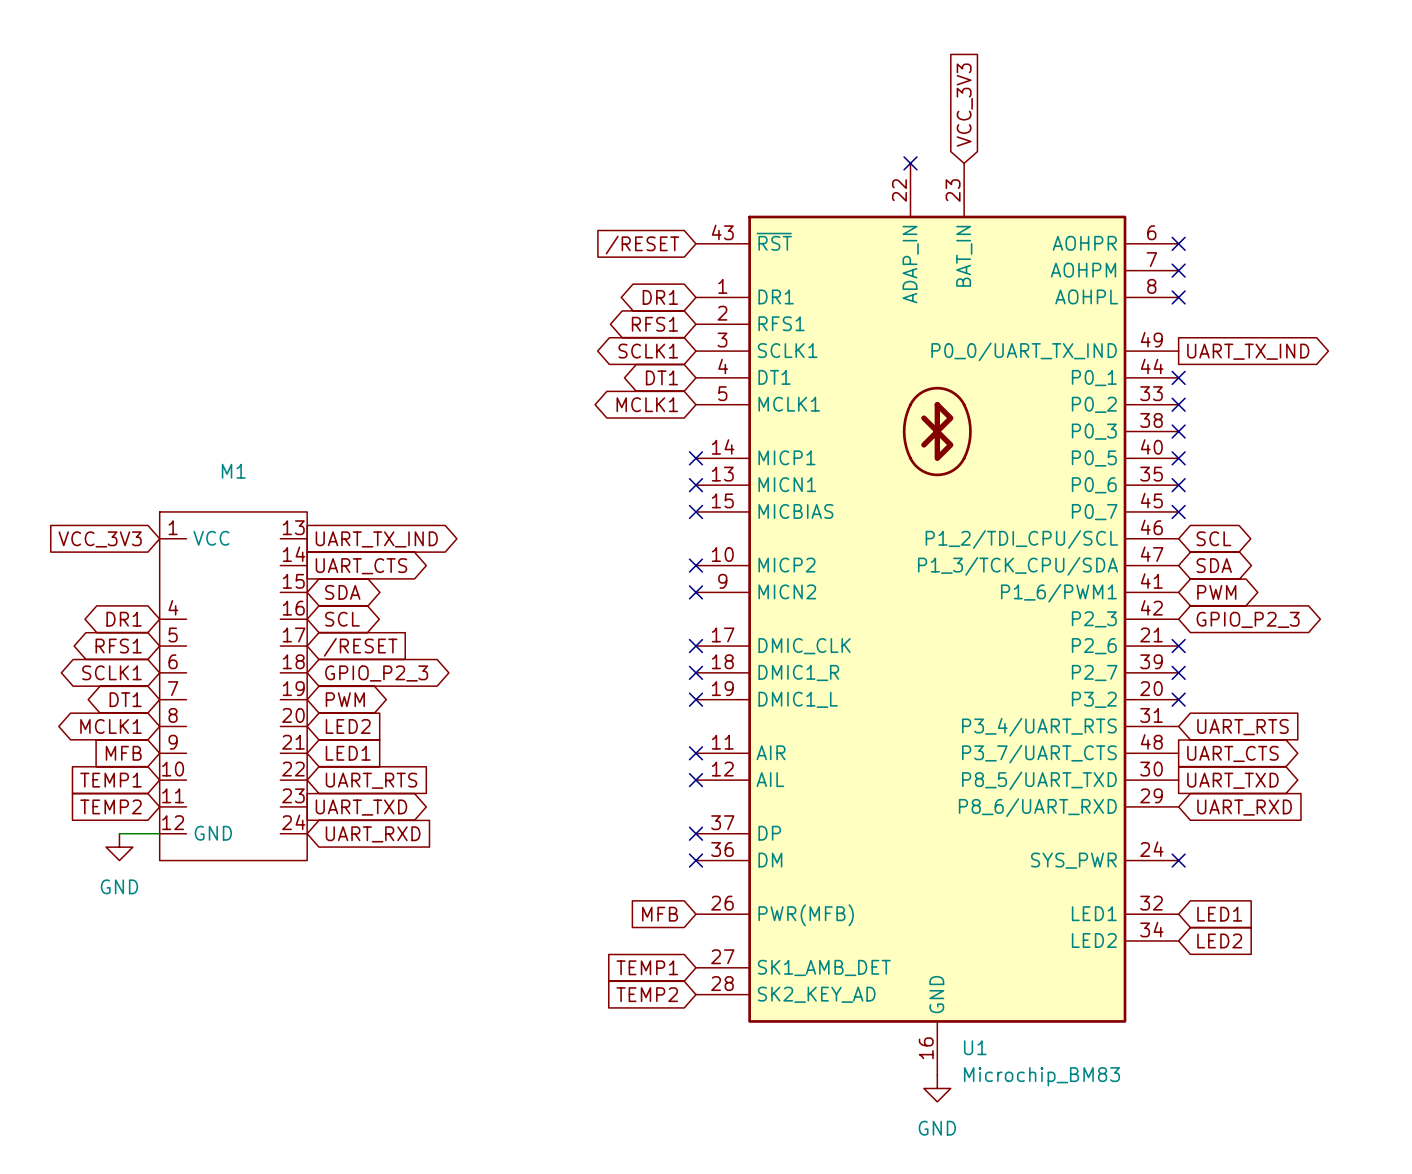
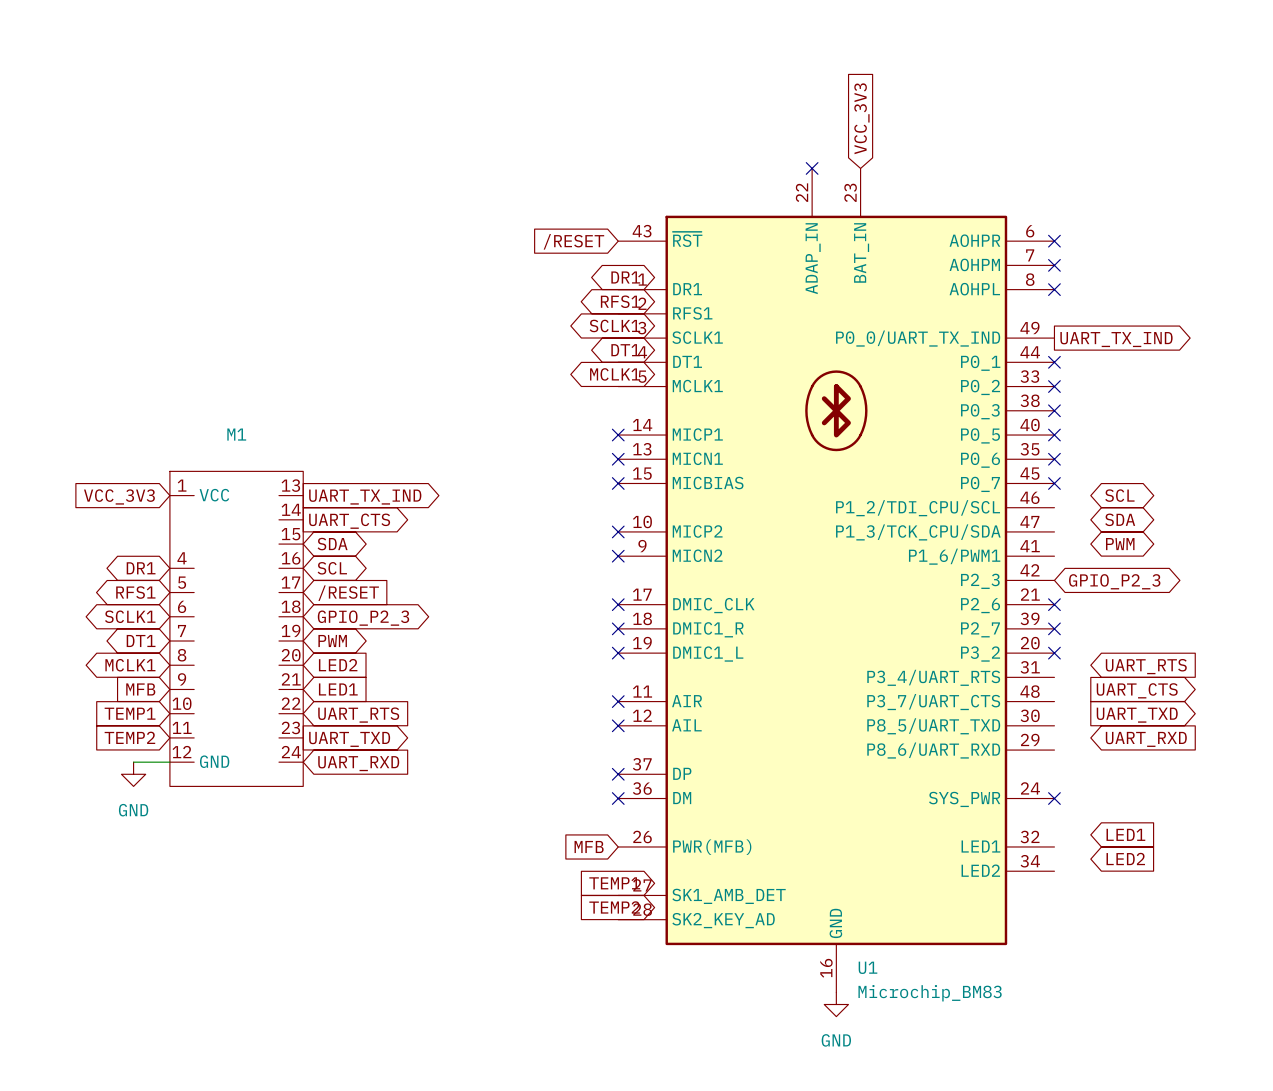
global label position: VCC_3V3 (964, 105) -> VCC_3V3 (861, 118)
no-connect mark position: (910, 163) -> (812, 168)
no-connect mark: (1178, 243) -> none
global label position: /RESET (642, 245) -> /RESET (573, 241)
no-connect mark: none -> (1054, 241)
no-connect mark: (1178, 270) -> none
no-connect mark: none -> (1054, 265)
no-connect mark: (1178, 297) -> none
no-connect mark: none -> (1054, 289)
global label position: UART_TX_IND (1248, 351) -> UART_TX_IND (1116, 339)
no-connect mark: (1178, 377) -> none
no-connect mark: none -> (1054, 362)
no-connect mark: (1178, 404) -> none
no-connect mark: none -> (1054, 386)
no-connect mark: (1178, 431) -> none
no-connect mark: none -> (1054, 410)
no-connect mark: (695, 458) -> none
no-connect mark: (1178, 458) -> none
no-connect mark: none -> (618, 435)
no-connect mark: none -> (1054, 435)
no-connect mark: (695, 485) -> none
no-connect mark: (1178, 485) -> none
no-connect mark: none -> (618, 459)
no-connect mark: none -> (1054, 459)
no-connect mark: (695, 511) -> none
no-connect mark: (1178, 511) -> none
no-connect mark: none -> (618, 483)
no-connect mark: none -> (1054, 483)
no-connect mark: (695, 565) -> none
no-connect mark: none -> (618, 531)
no-connect mark: (695, 592) -> none
no-connect mark: none -> (618, 556)
U1 position: (937, 619) -> (836, 580)
global label position: GPIO_P2_3 (1248, 619) -> GPIO_P2_3 (1114, 581)
no-connect mark: (695, 646) -> none
no-connect mark: (1178, 646) -> none
no-connect mark: none -> (618, 604)
no-connect mark: none -> (1054, 604)
no-connect mark: (695, 672) -> none
no-connect mark: (1178, 672) -> none
no-connect mark: none -> (618, 628)
no-connect mark: none -> (1054, 628)
no-connect mark: (695, 699) -> none
no-connect mark: (1178, 699) -> none
no-connect mark: none -> (618, 653)
no-connect mark: none -> (1054, 653)
no-connect mark: (695, 753) -> none
no-connect mark: none -> (618, 701)
no-connect mark: (695, 780) -> none
no-connect mark: none -> (618, 725)
no-connect mark: (695, 833) -> none
no-connect mark: none -> (618, 774)
no-connect mark: (695, 860) -> none
no-connect mark position: (1178, 860) -> (1054, 798)
no-connect mark: none -> (618, 798)
global label position: MFB (660, 914) -> MFB (589, 846)
power symbol position: GND (937, 1088) -> GND (836, 1004)

